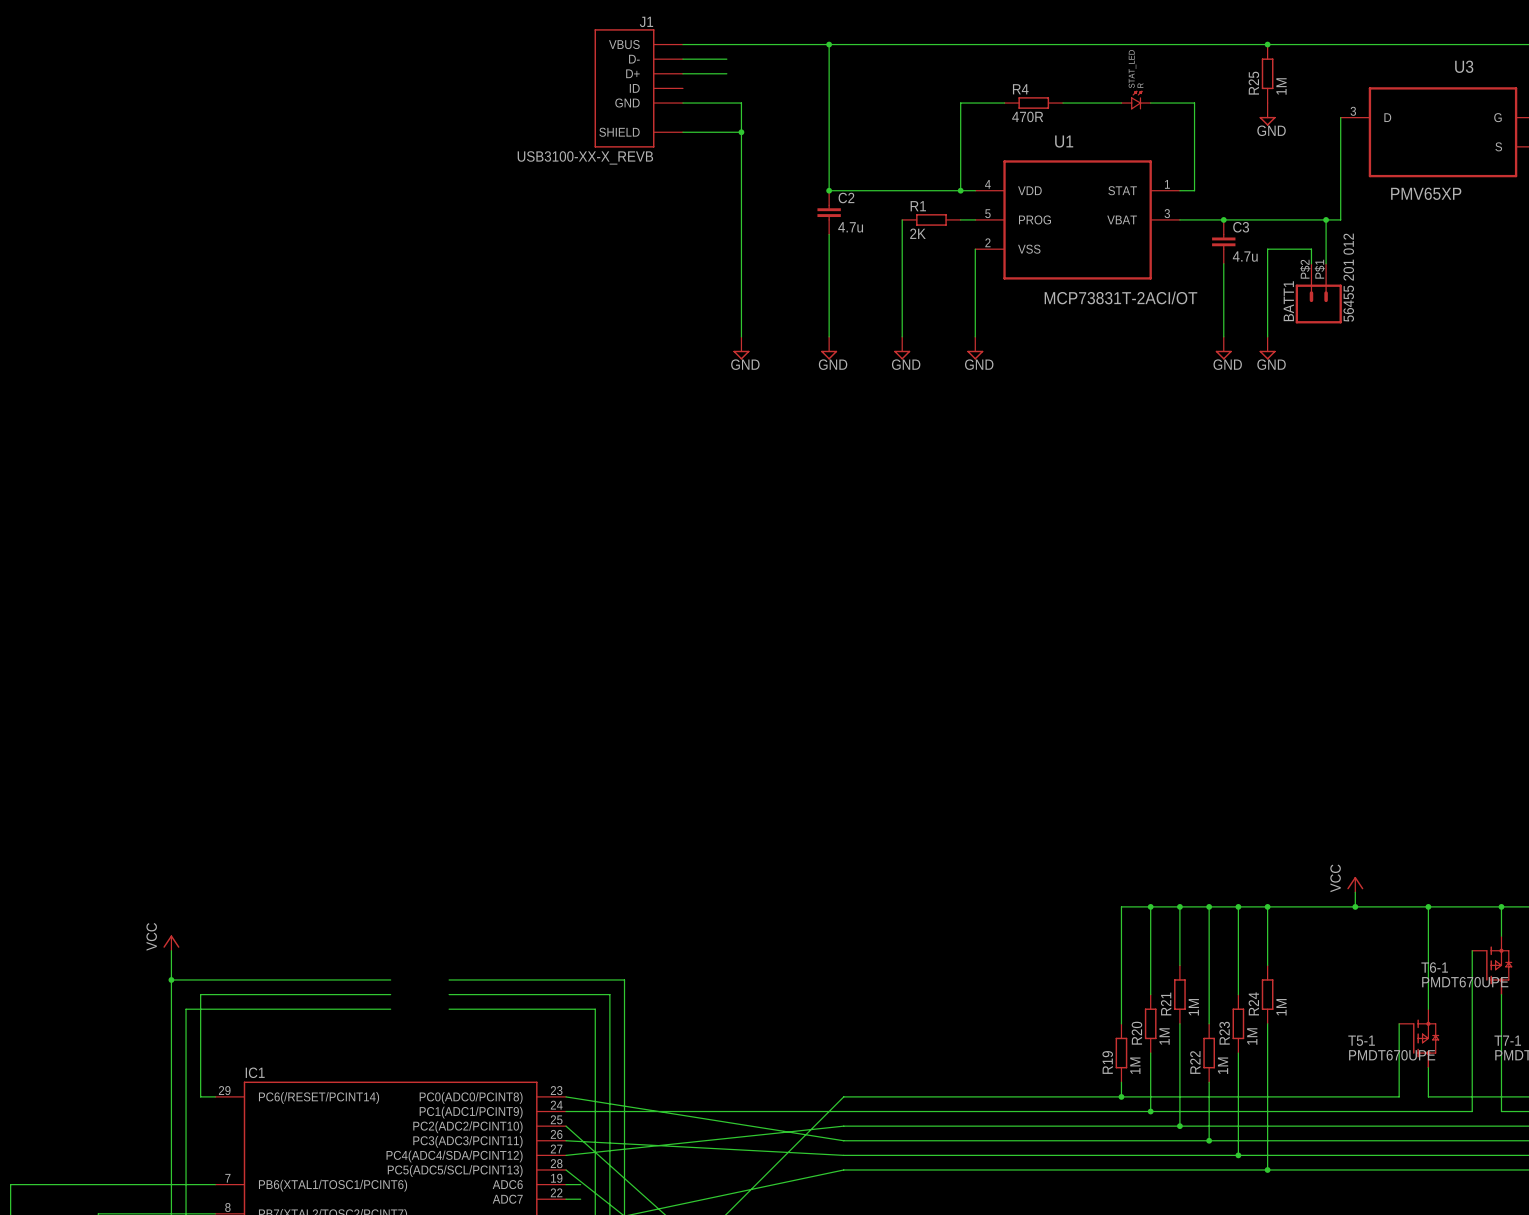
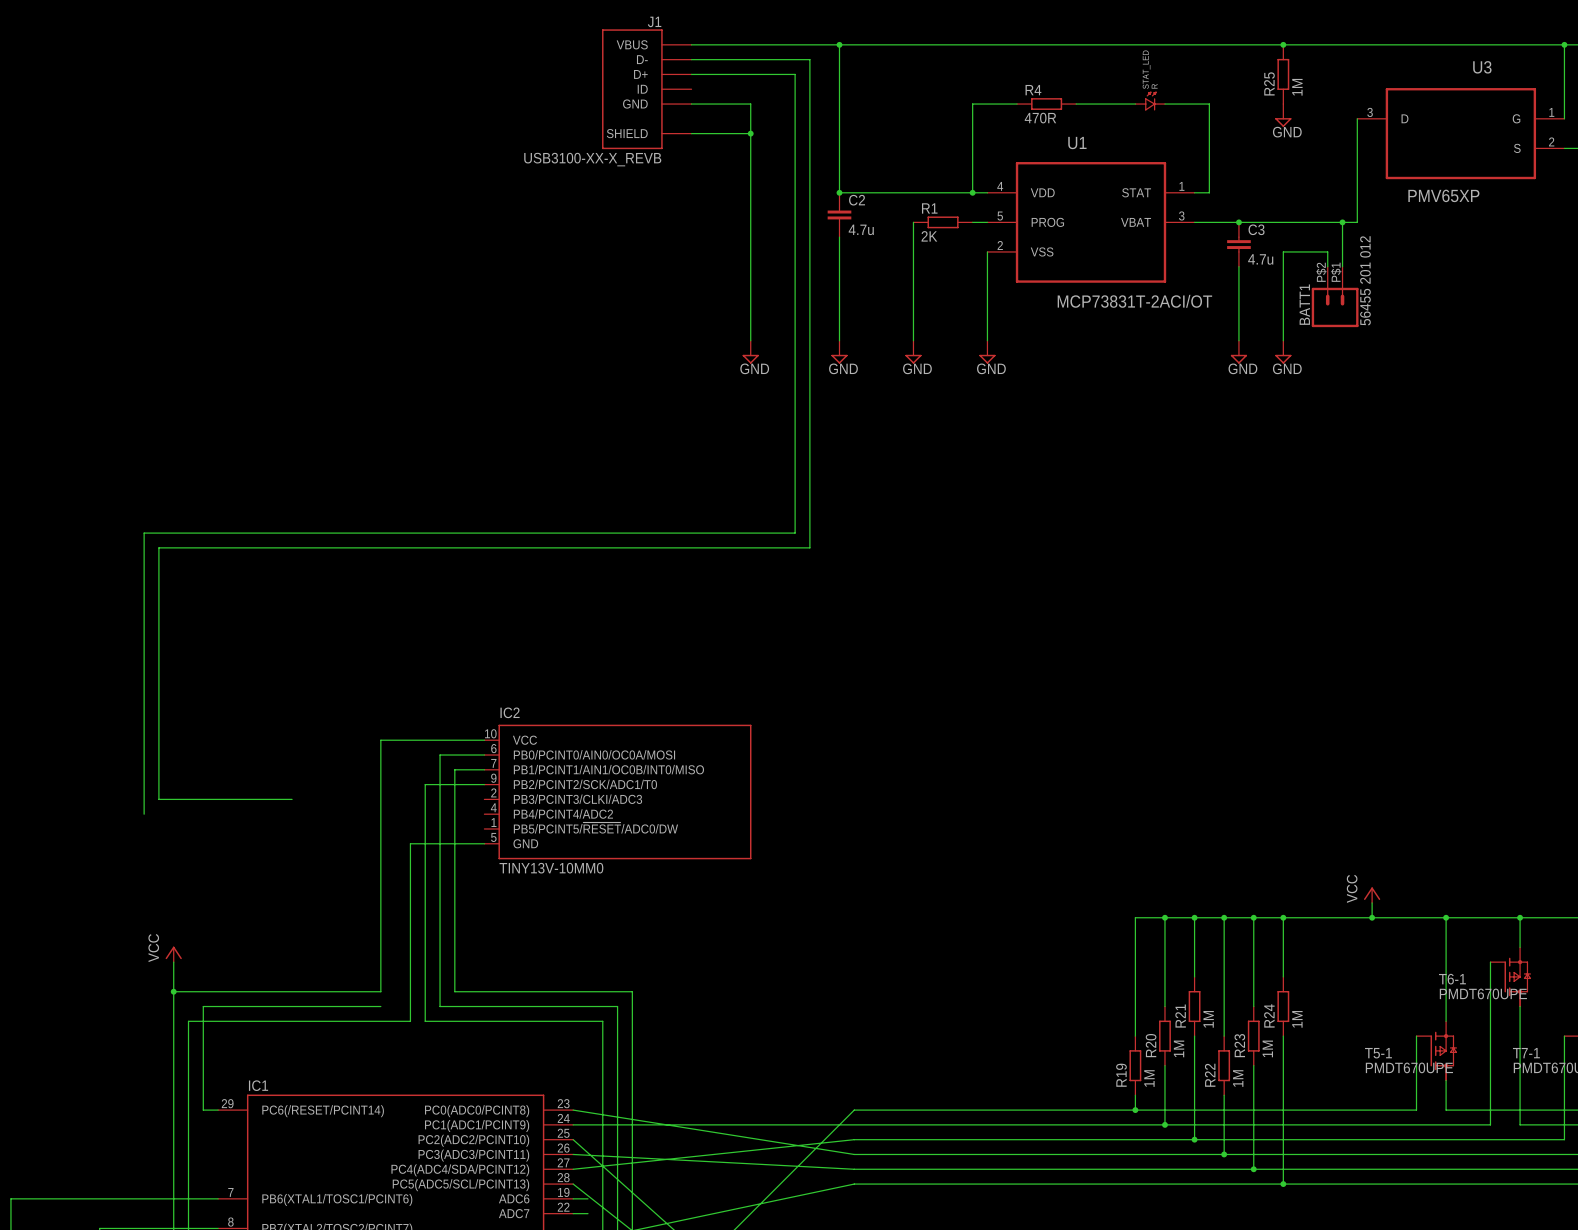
wire: none -> (735, 59) (809, 59) (809, 547) (158, 547) (158, 799) (292, 799)
wire: none -> (735, 74) (795, 74) (795, 533) (144, 533) (144, 814)
wire: none -> (484, 755) (440, 755) (440, 1006) (454, 1006)
wire: none -> (484, 769) (454, 769) (454, 991)
wire: none -> (484, 784) (425, 784) (425, 1021) (454, 1021)
IC2: none -> TINY13V-10MM0 (617, 791)
wire: none -> (484, 843) (410, 843) (410, 1021) (395, 1021)
wire: (376, 979) (390, 979) -> (380, 991) (380, 740) (484, 740)
wire: (376, 994) (390, 994) -> none

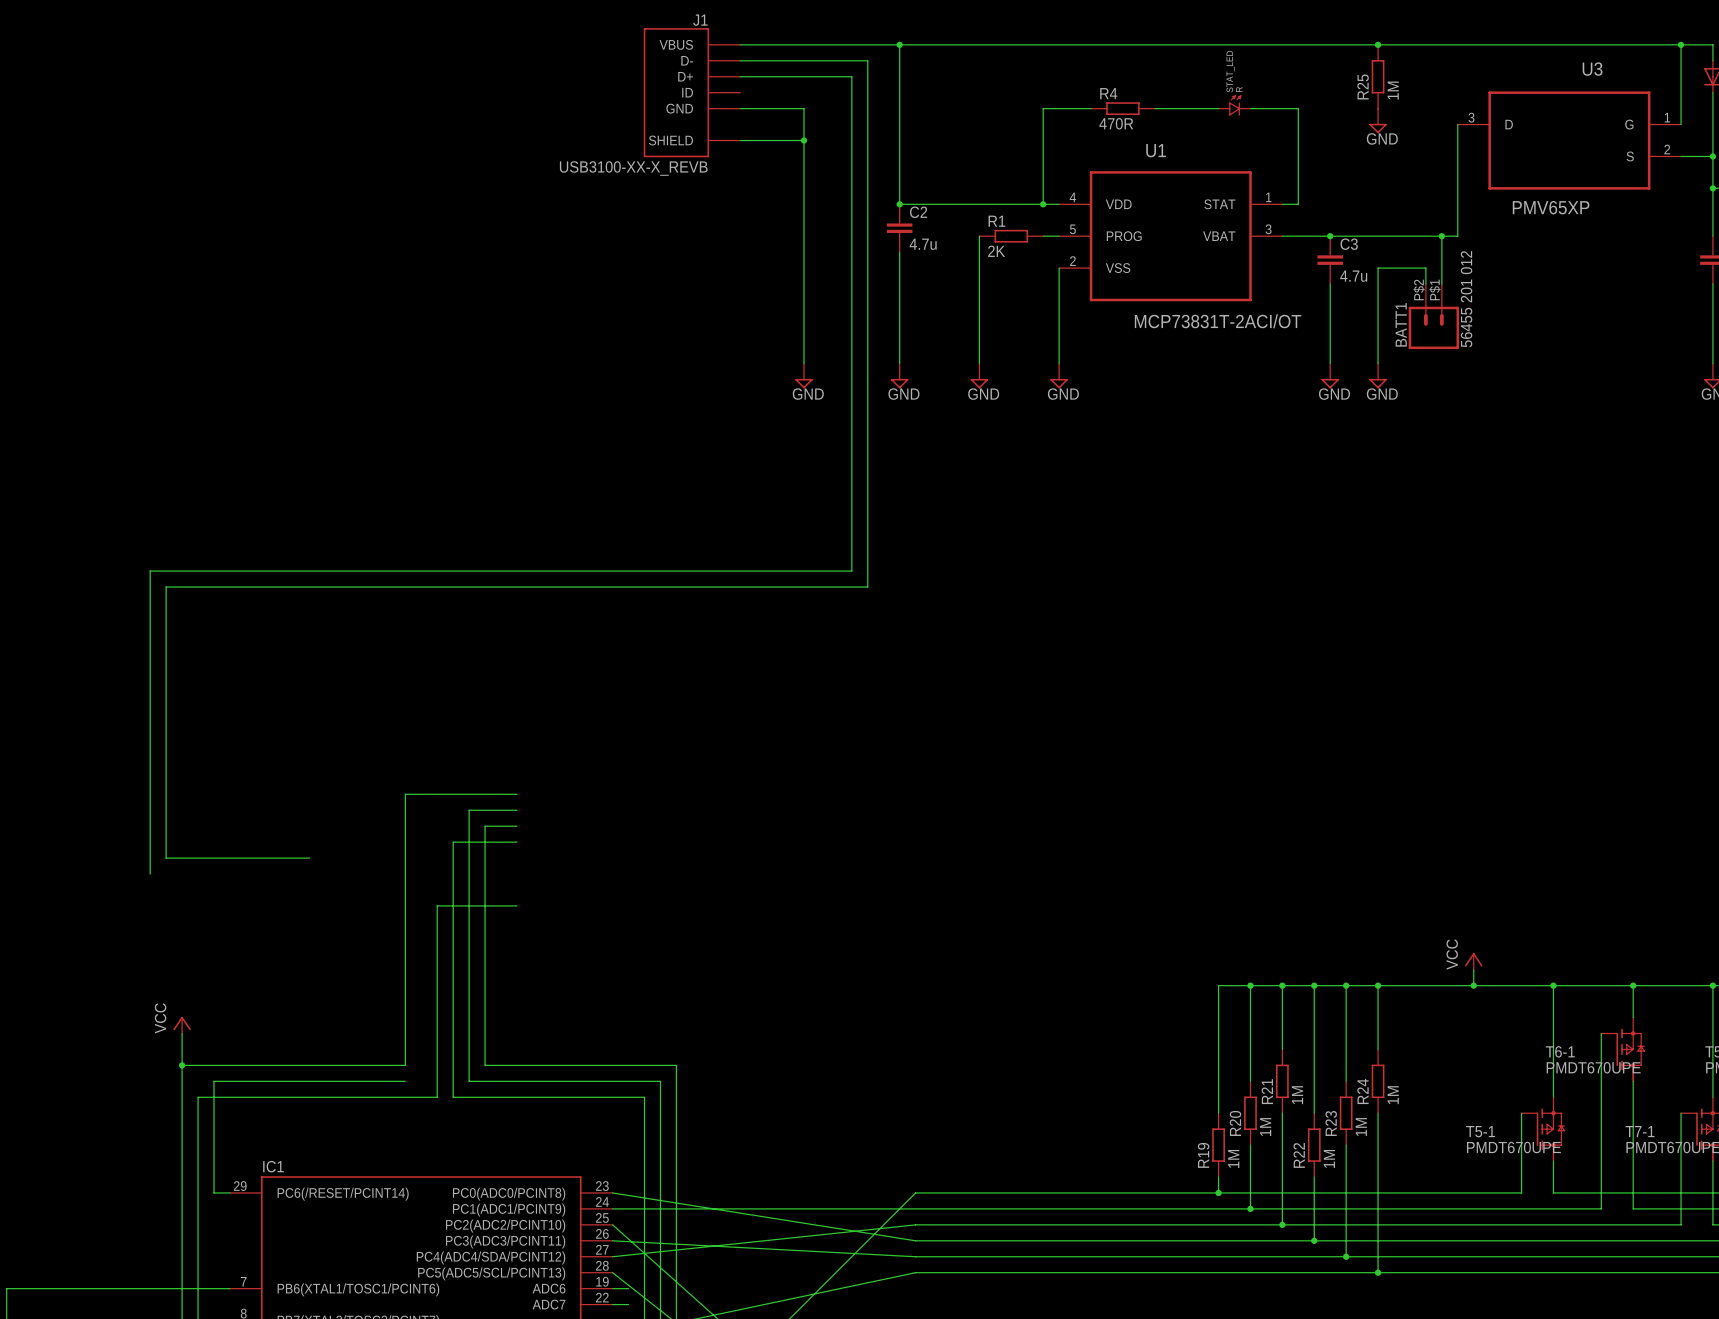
IC2: TINY13V-10MM0 (617, 791) -> none

